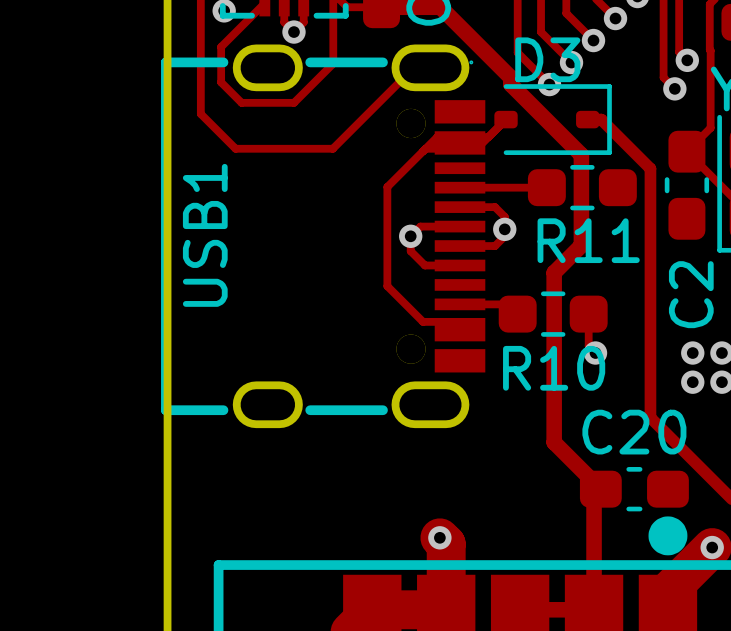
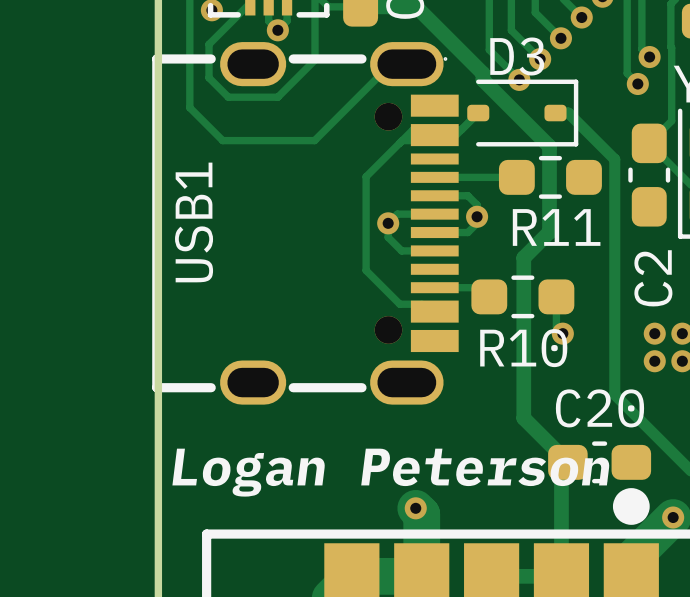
text: none -> Logan Peterson (390, 472)

